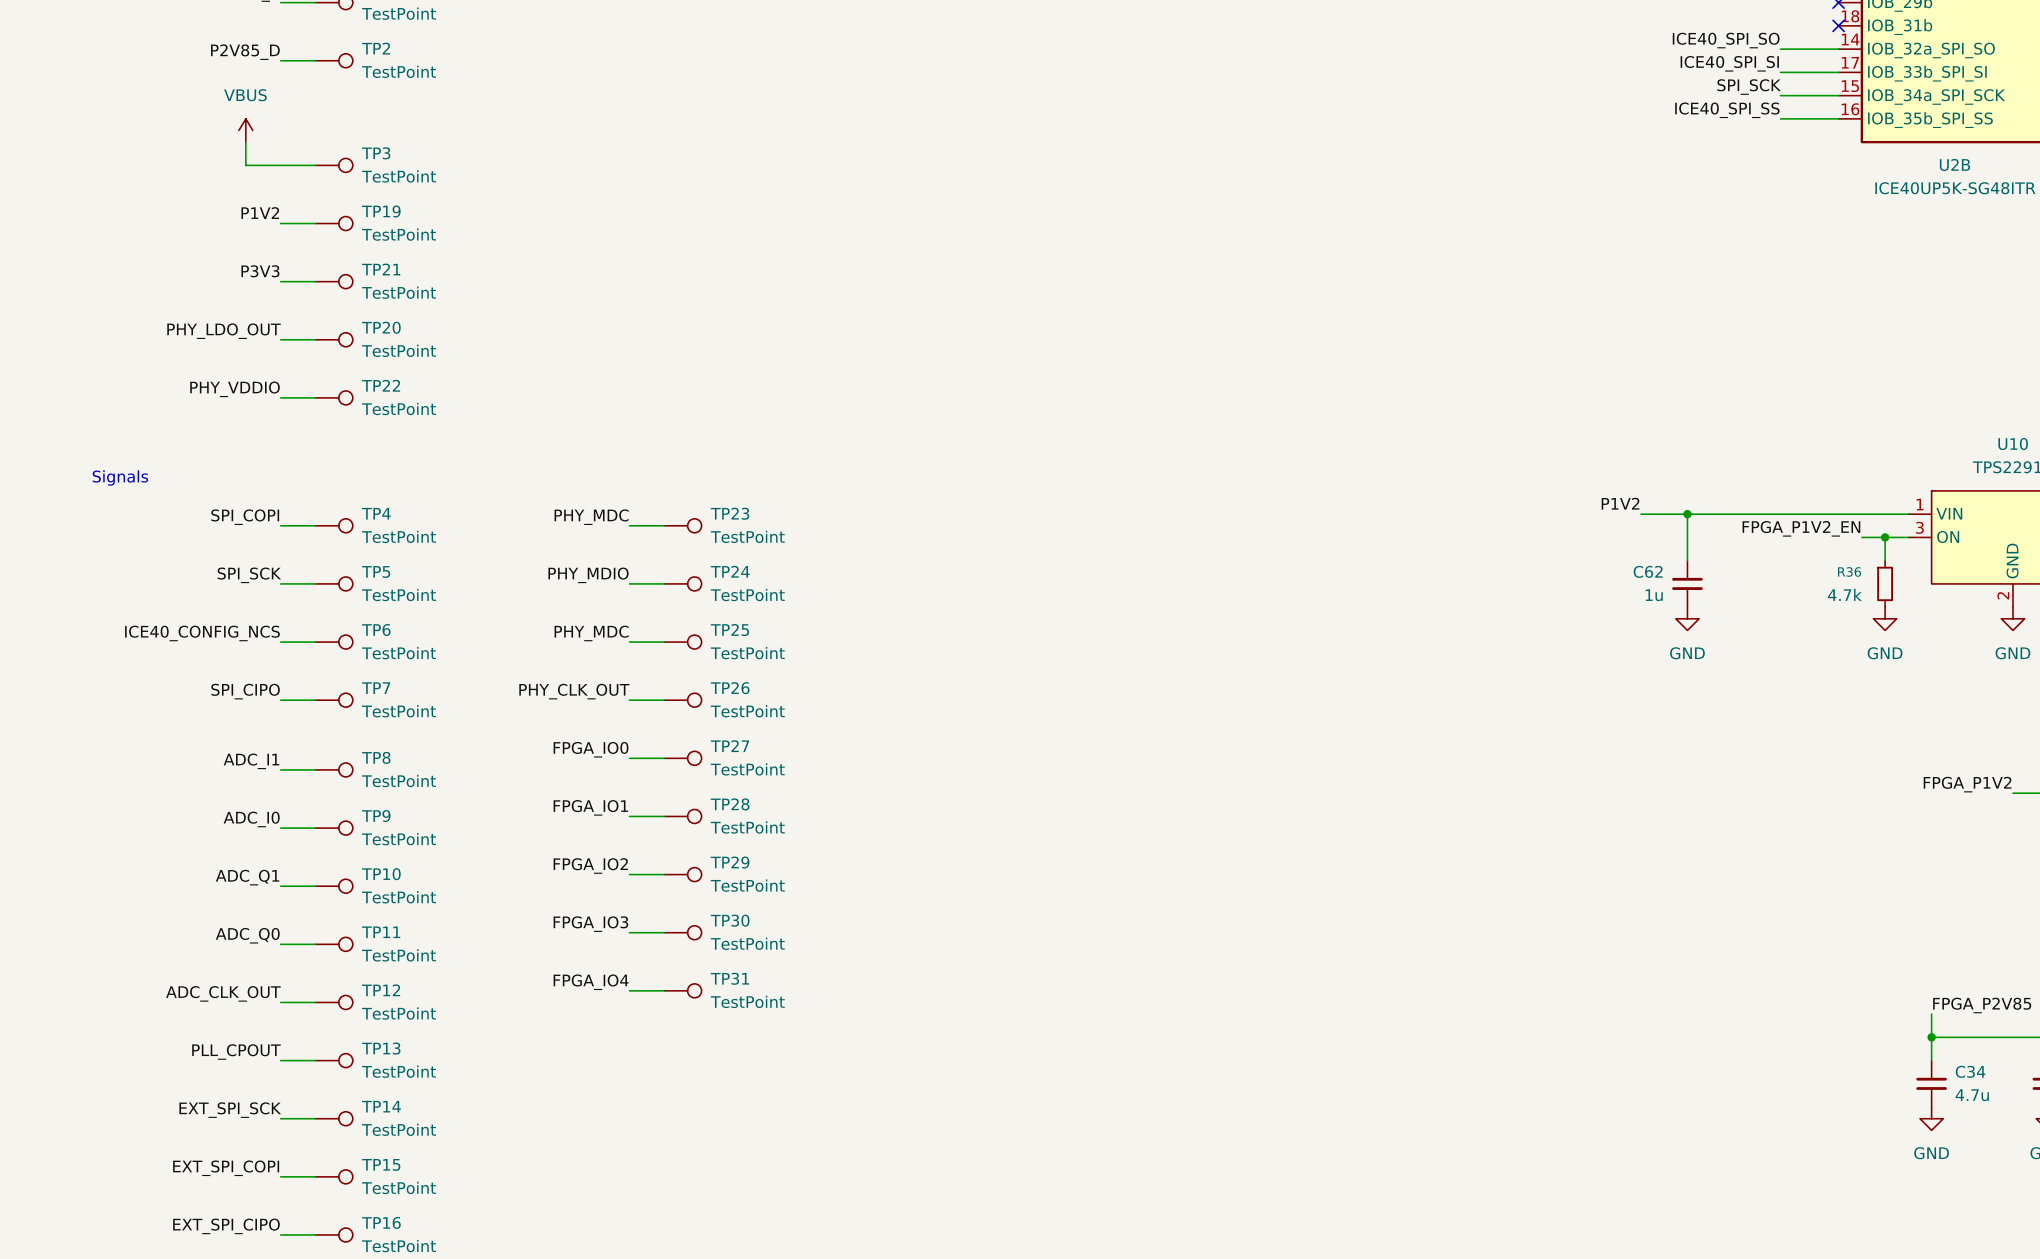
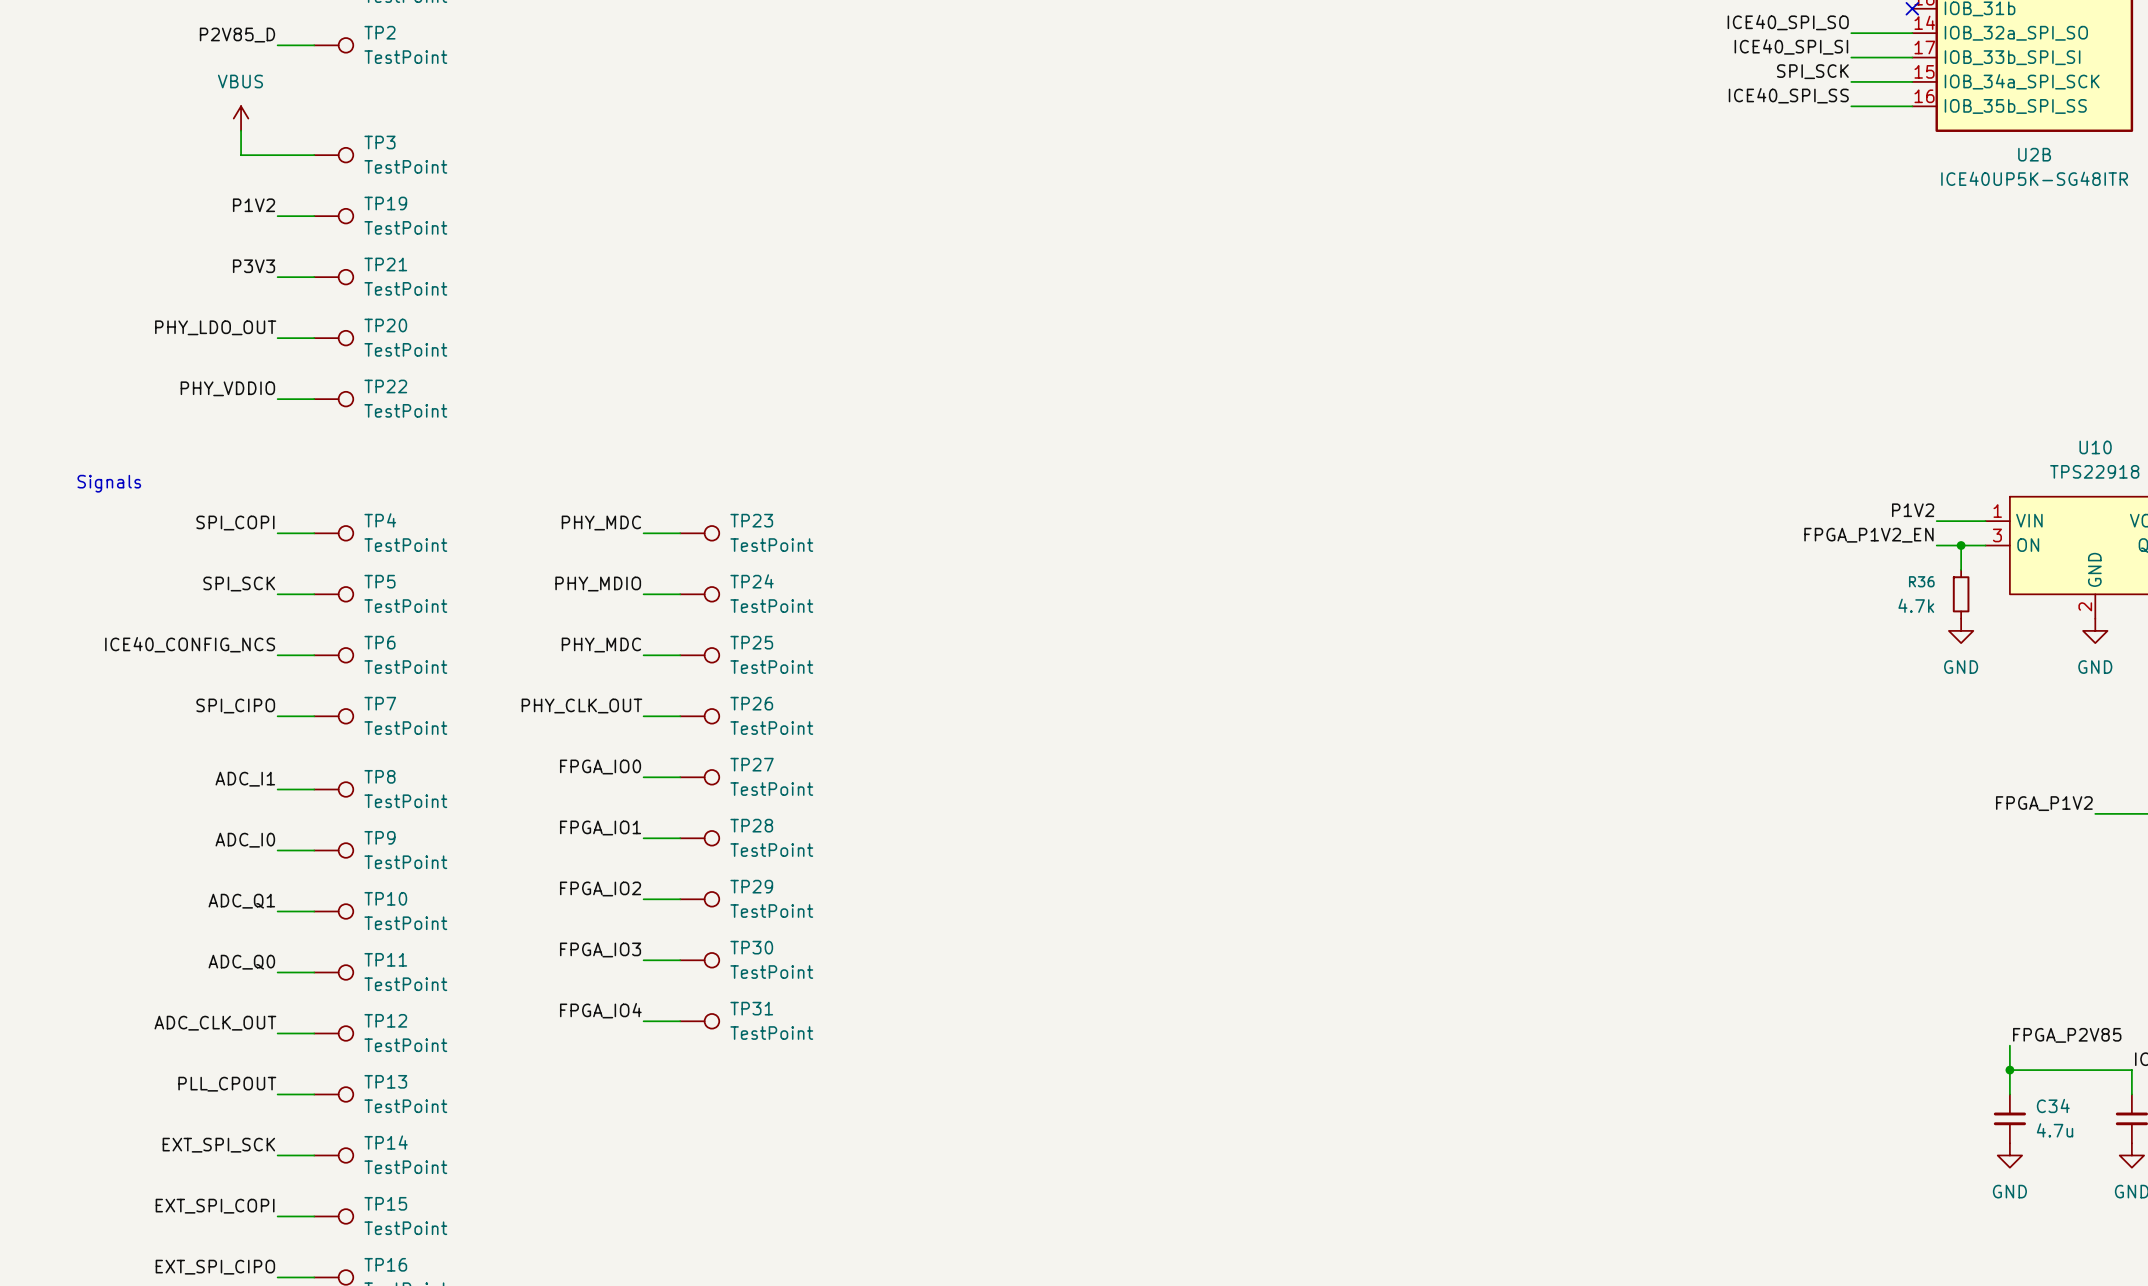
label position: P1V2 (1620, 503) -> P1V2 (1913, 510)
wire: (1640, 514) (1861, 514) -> none
wire: (1687, 514) (1687, 560) -> none
junction: (1687, 514) -> none
C62: 1u (1687, 583) -> none
power symbol: GND (1687, 618) -> none

